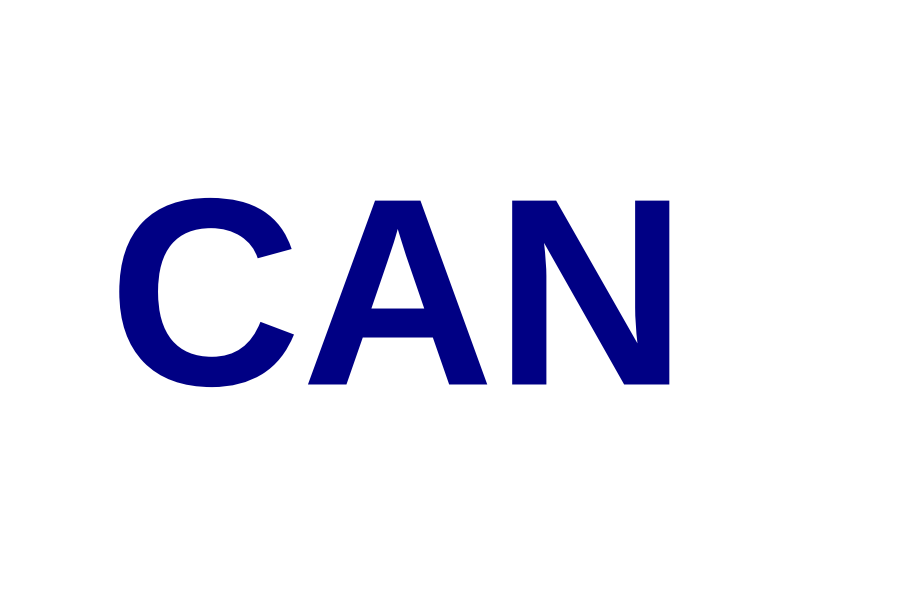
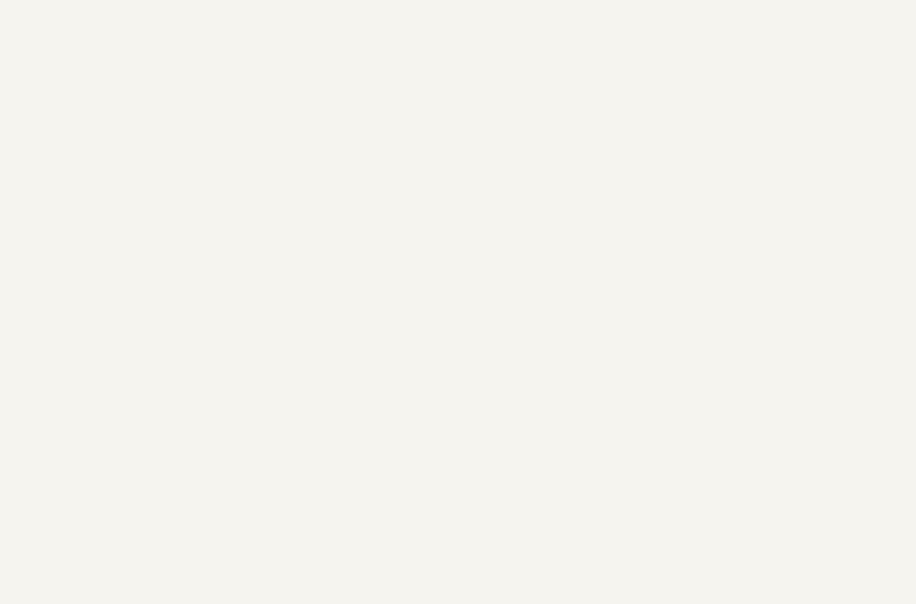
text: CAN (394, 292) -> none

